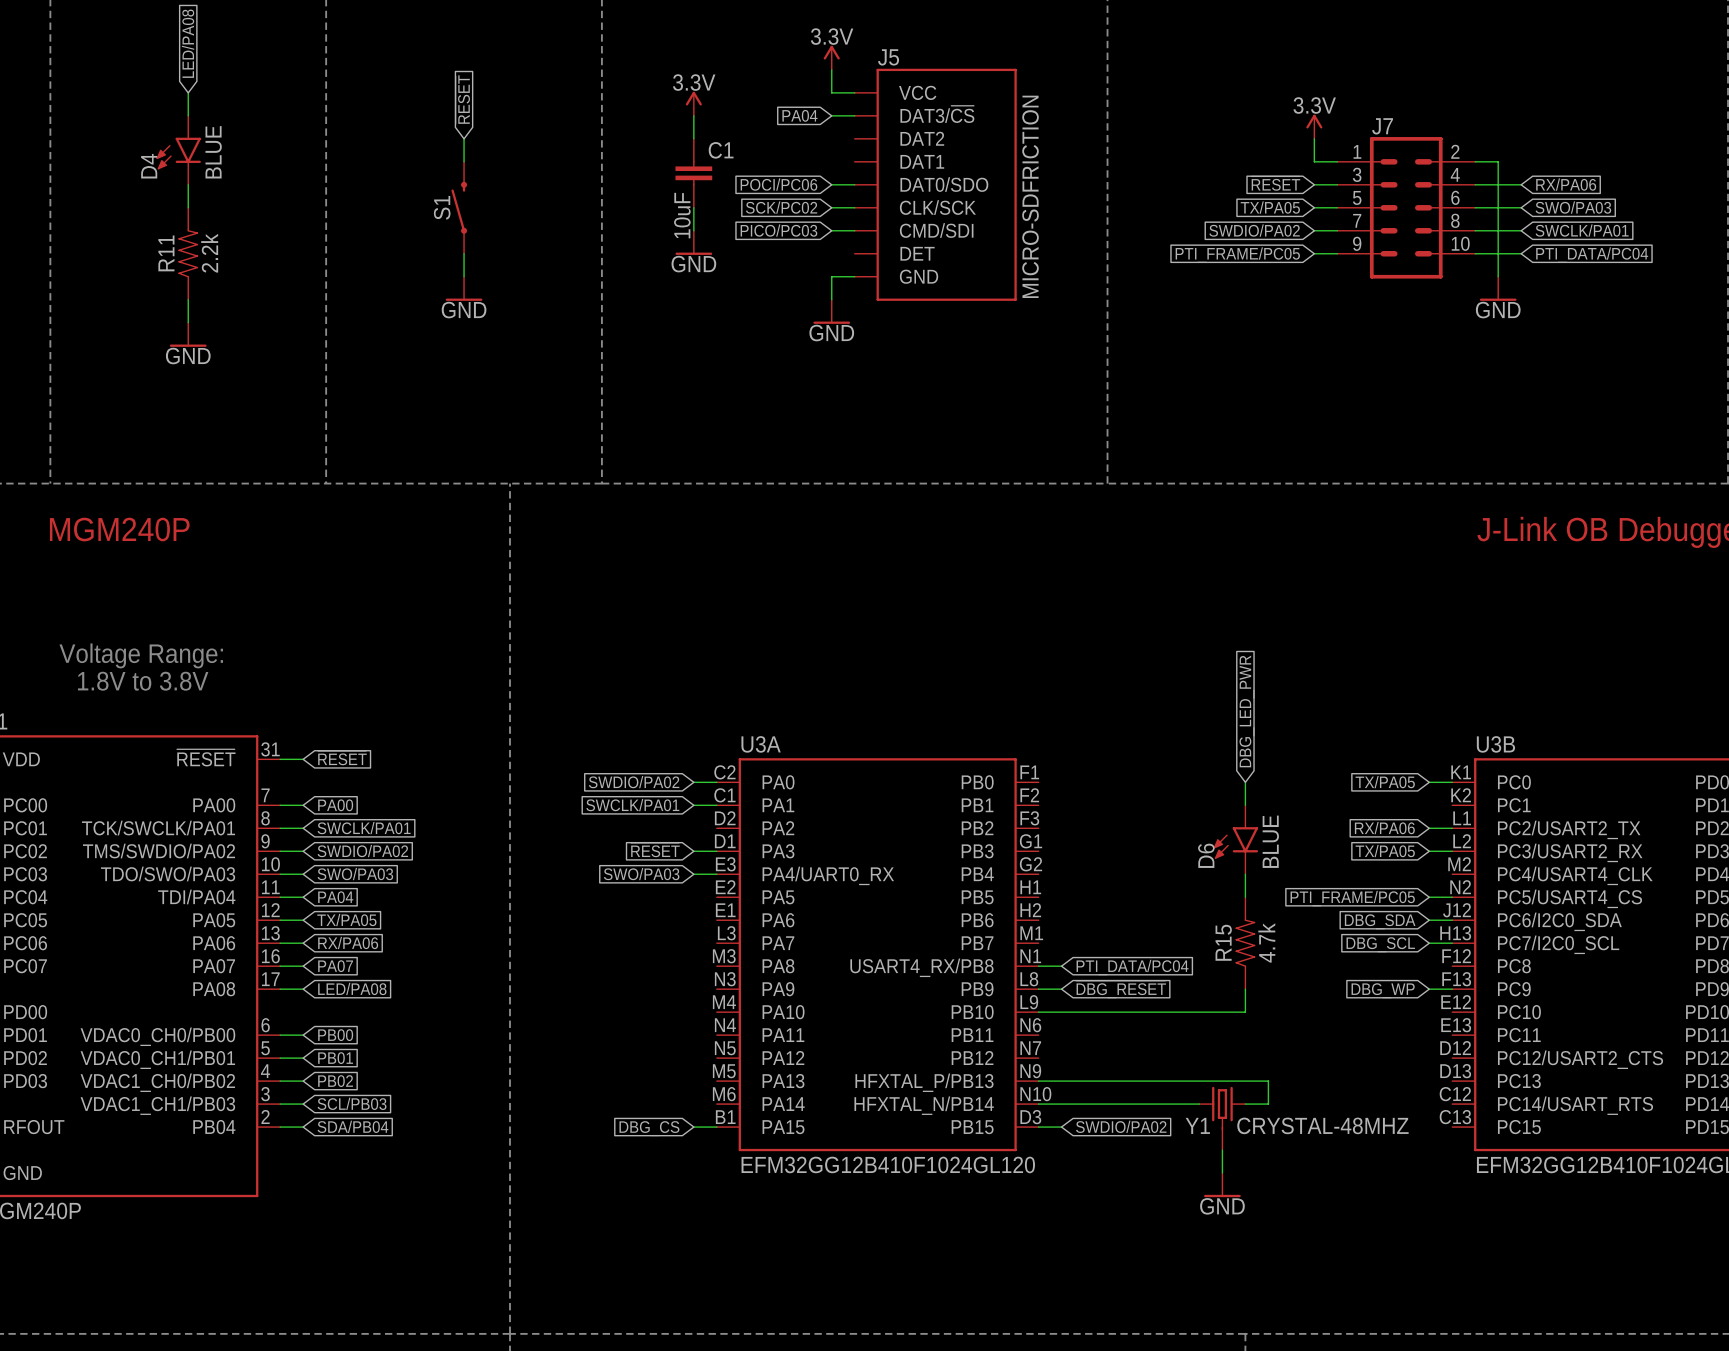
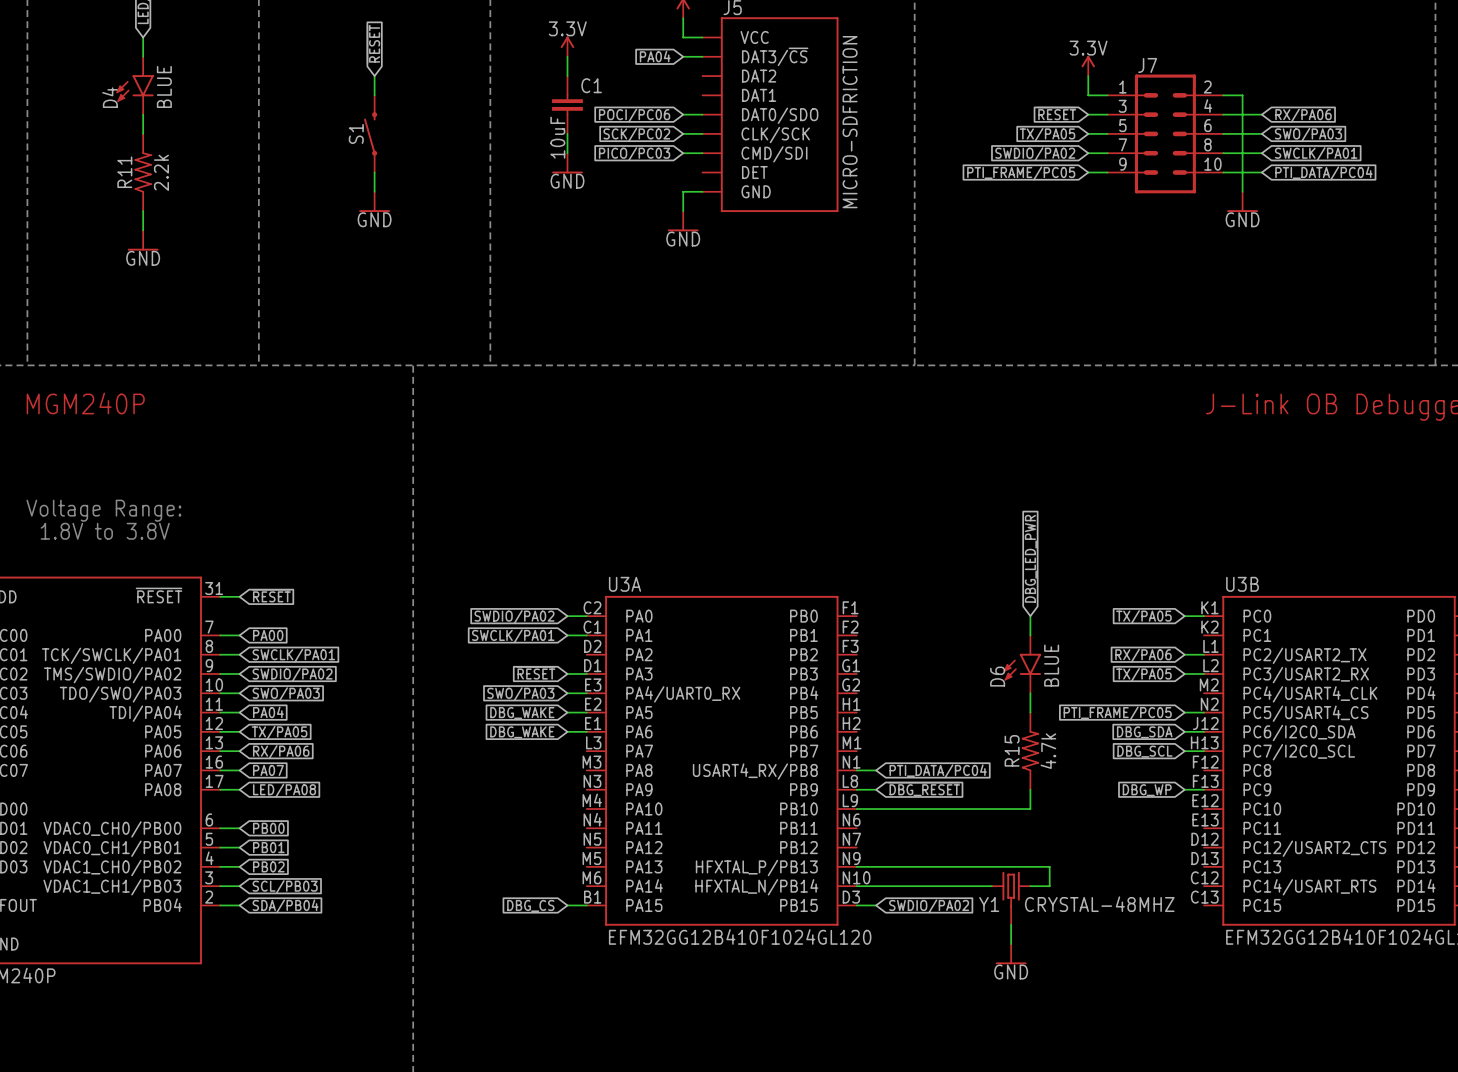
wire: none -> (567, 712) (586, 712)
global label: none -> DBG_WAKE (522, 713)
wire: none -> (567, 731) (586, 731)
global label: none -> DBG_WAKE (522, 732)

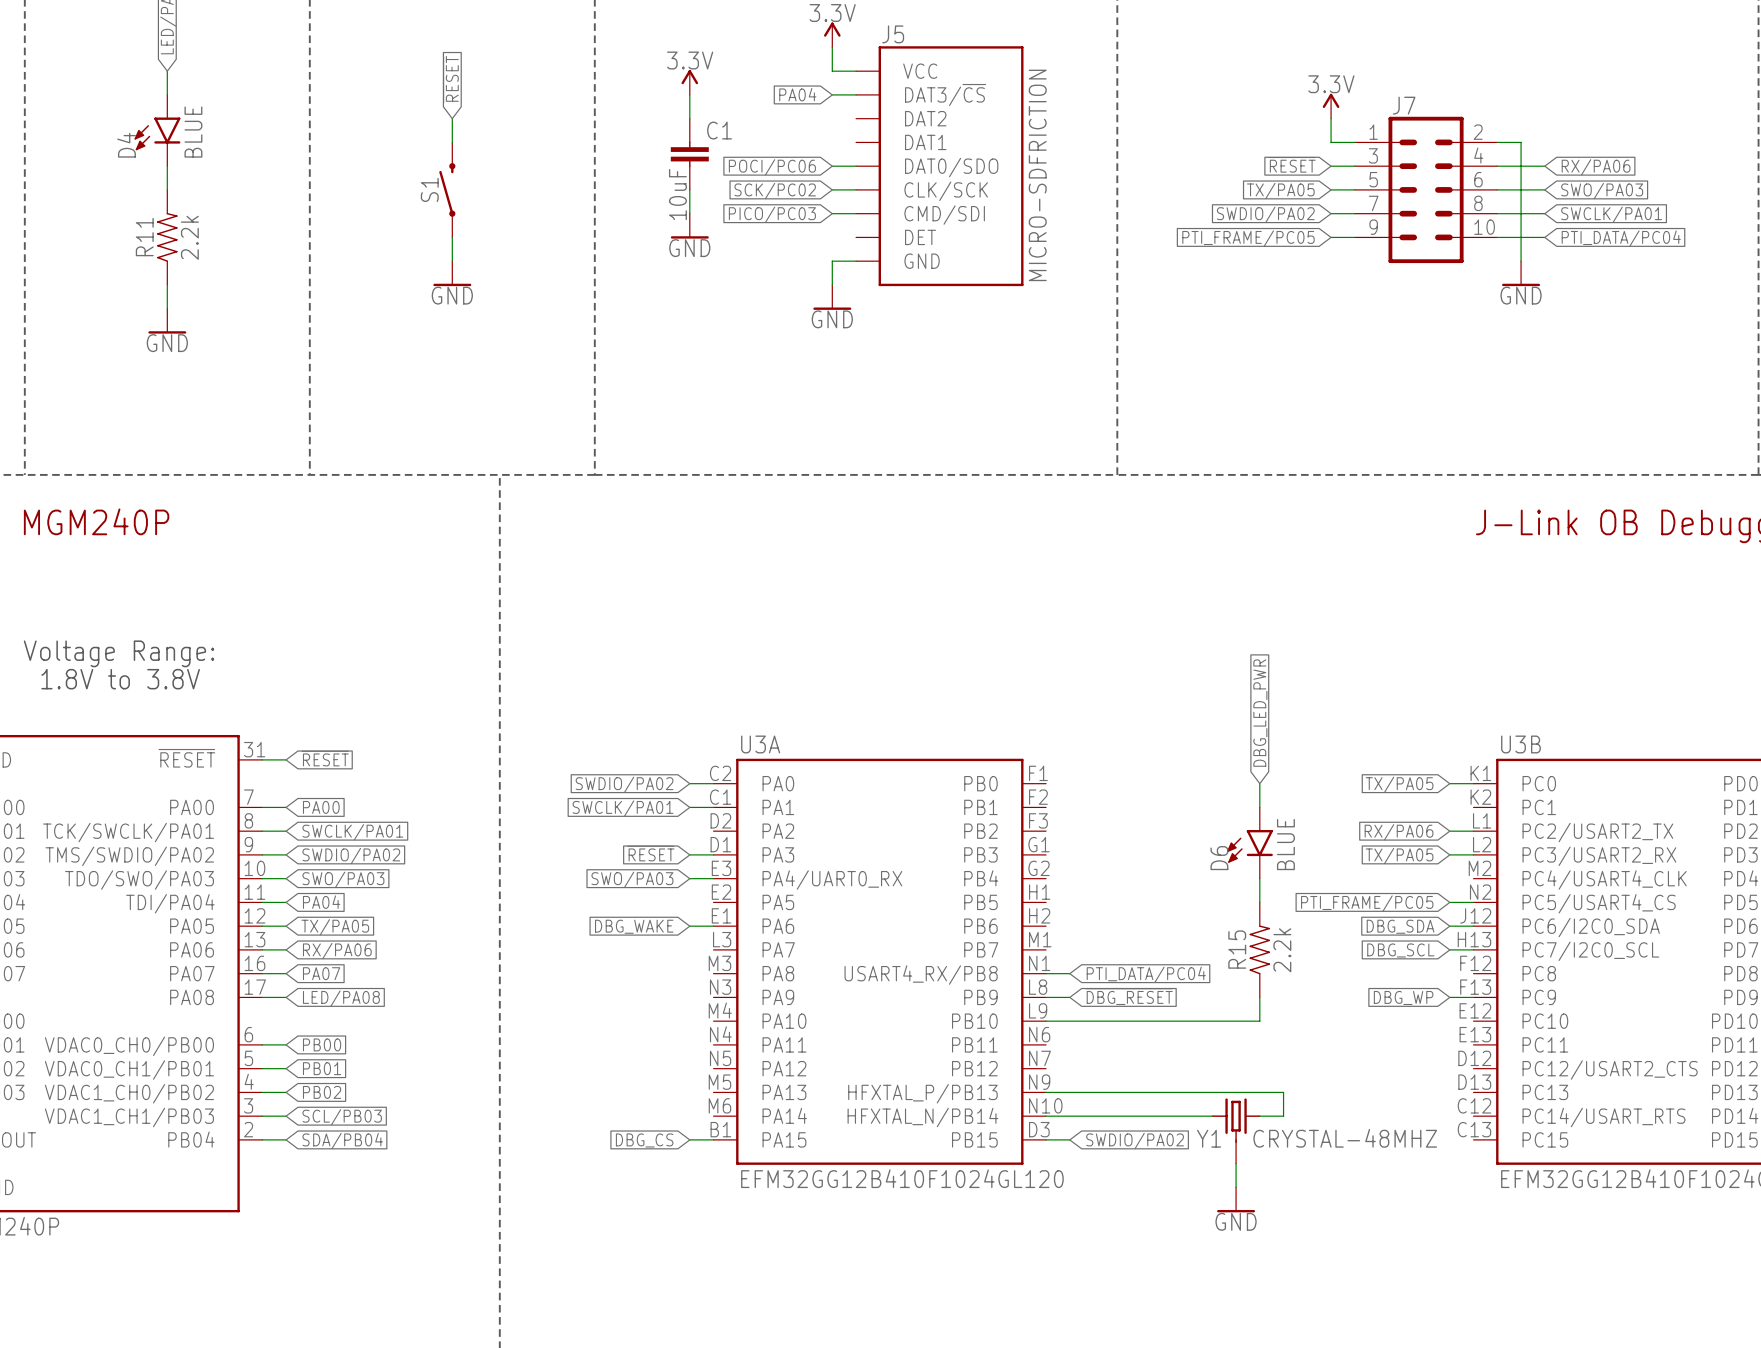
wire: (567, 712) (586, 712) -> none
global label: DBG_WAKE (522, 713) -> none
R15 value: 4.7k (1048, 751) -> 2.2k (1282, 950)

